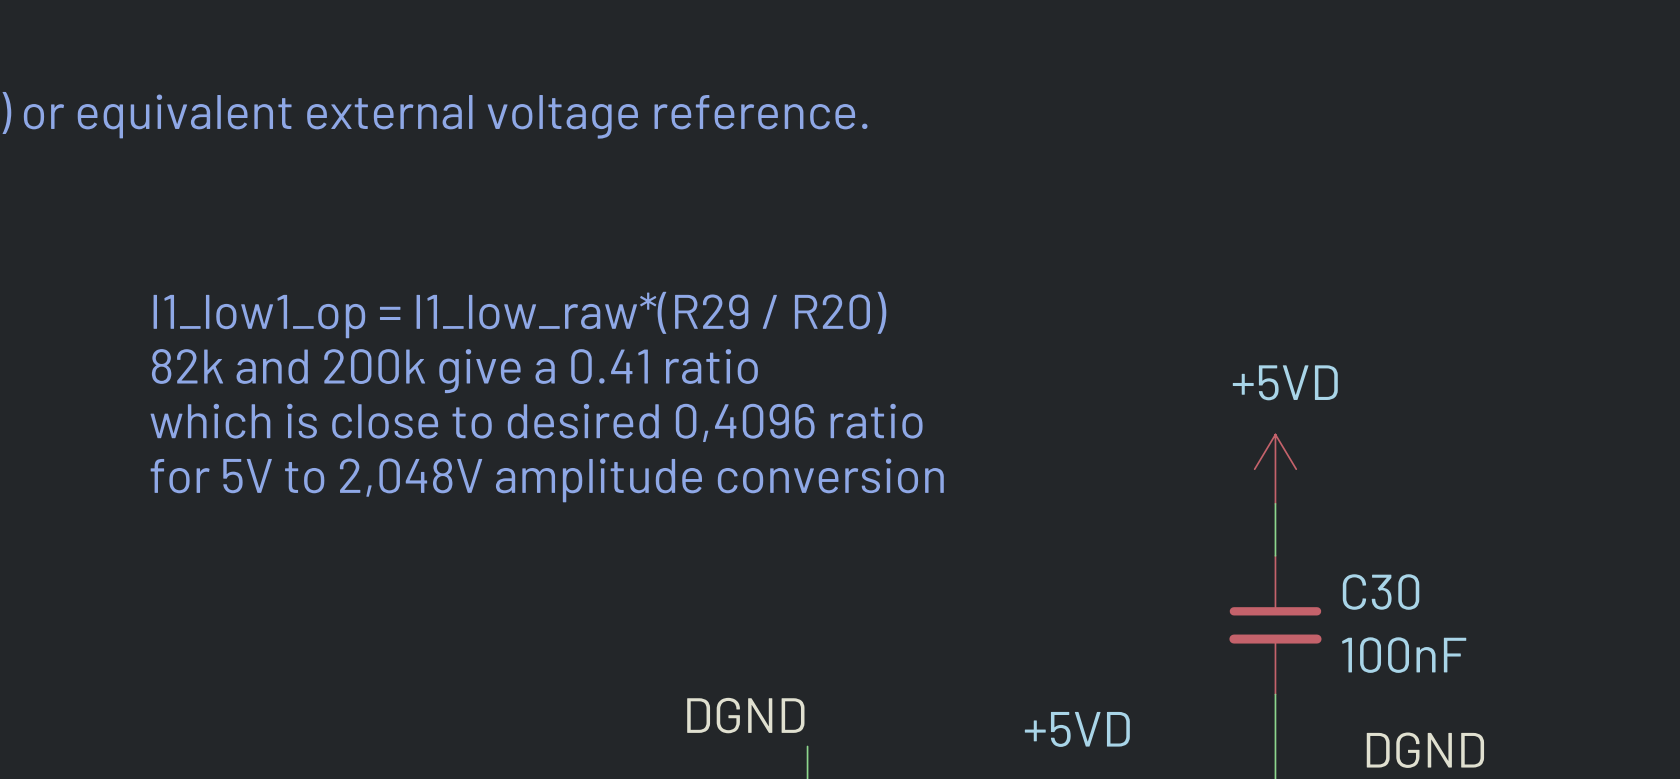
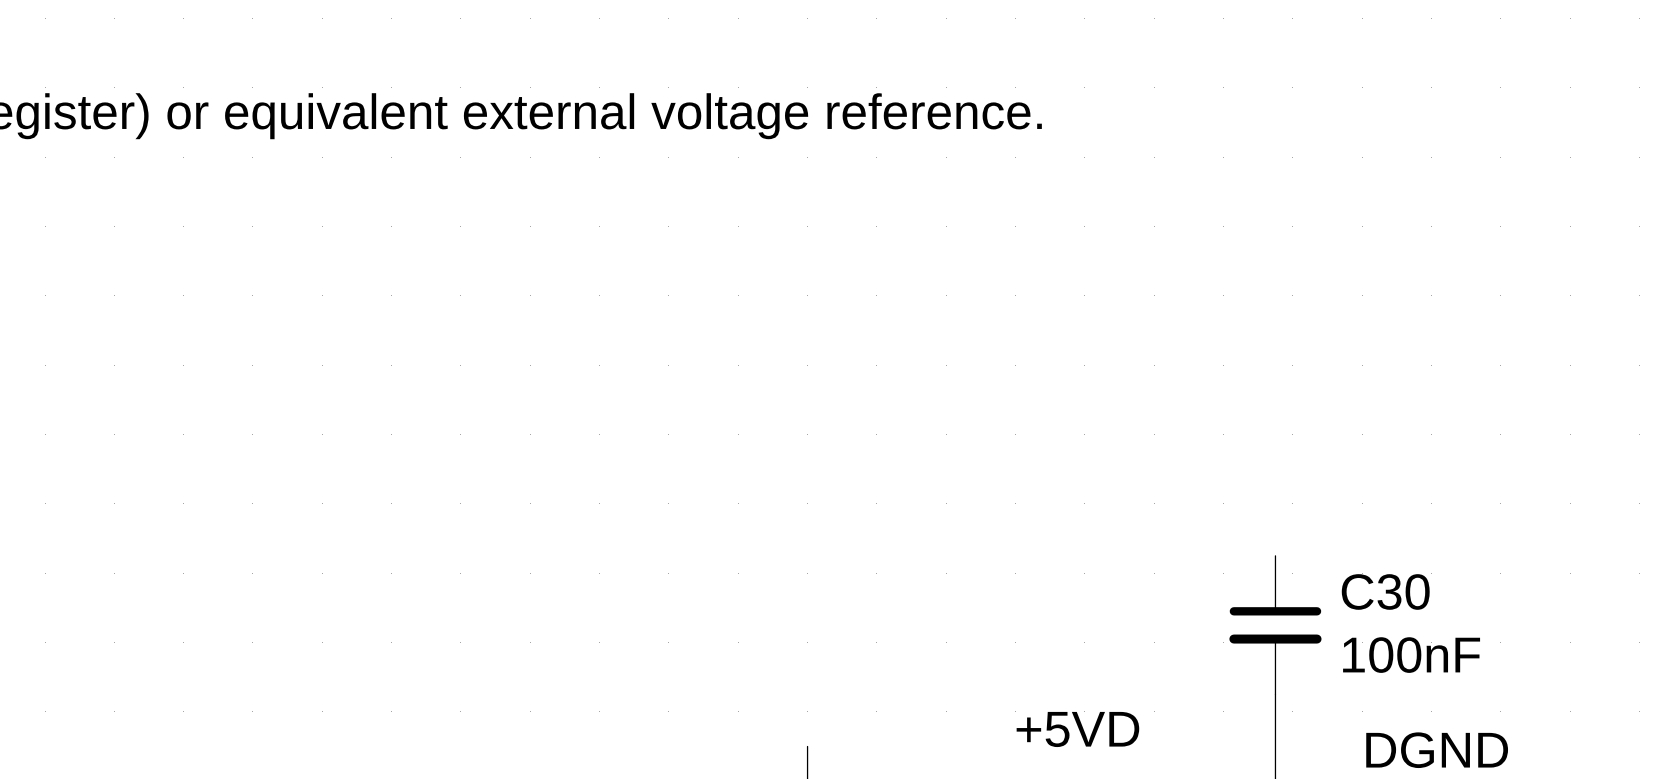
text: I1_low1_op = I1_low_raw*(R29 / R20) (519, 315) -> none
text: 82k and 200k give a 0.41 ratio (454, 371) -> none
text: which is close to desired 0,4096 ratio (536, 422) -> none
power symbol: +5VD (1275, 469) -> none
text: for 5V to 2,048V amplitude conversion (547, 480) -> none
wire: (1275, 503) (1275, 555) -> none
label: DGND (745, 715) -> none

